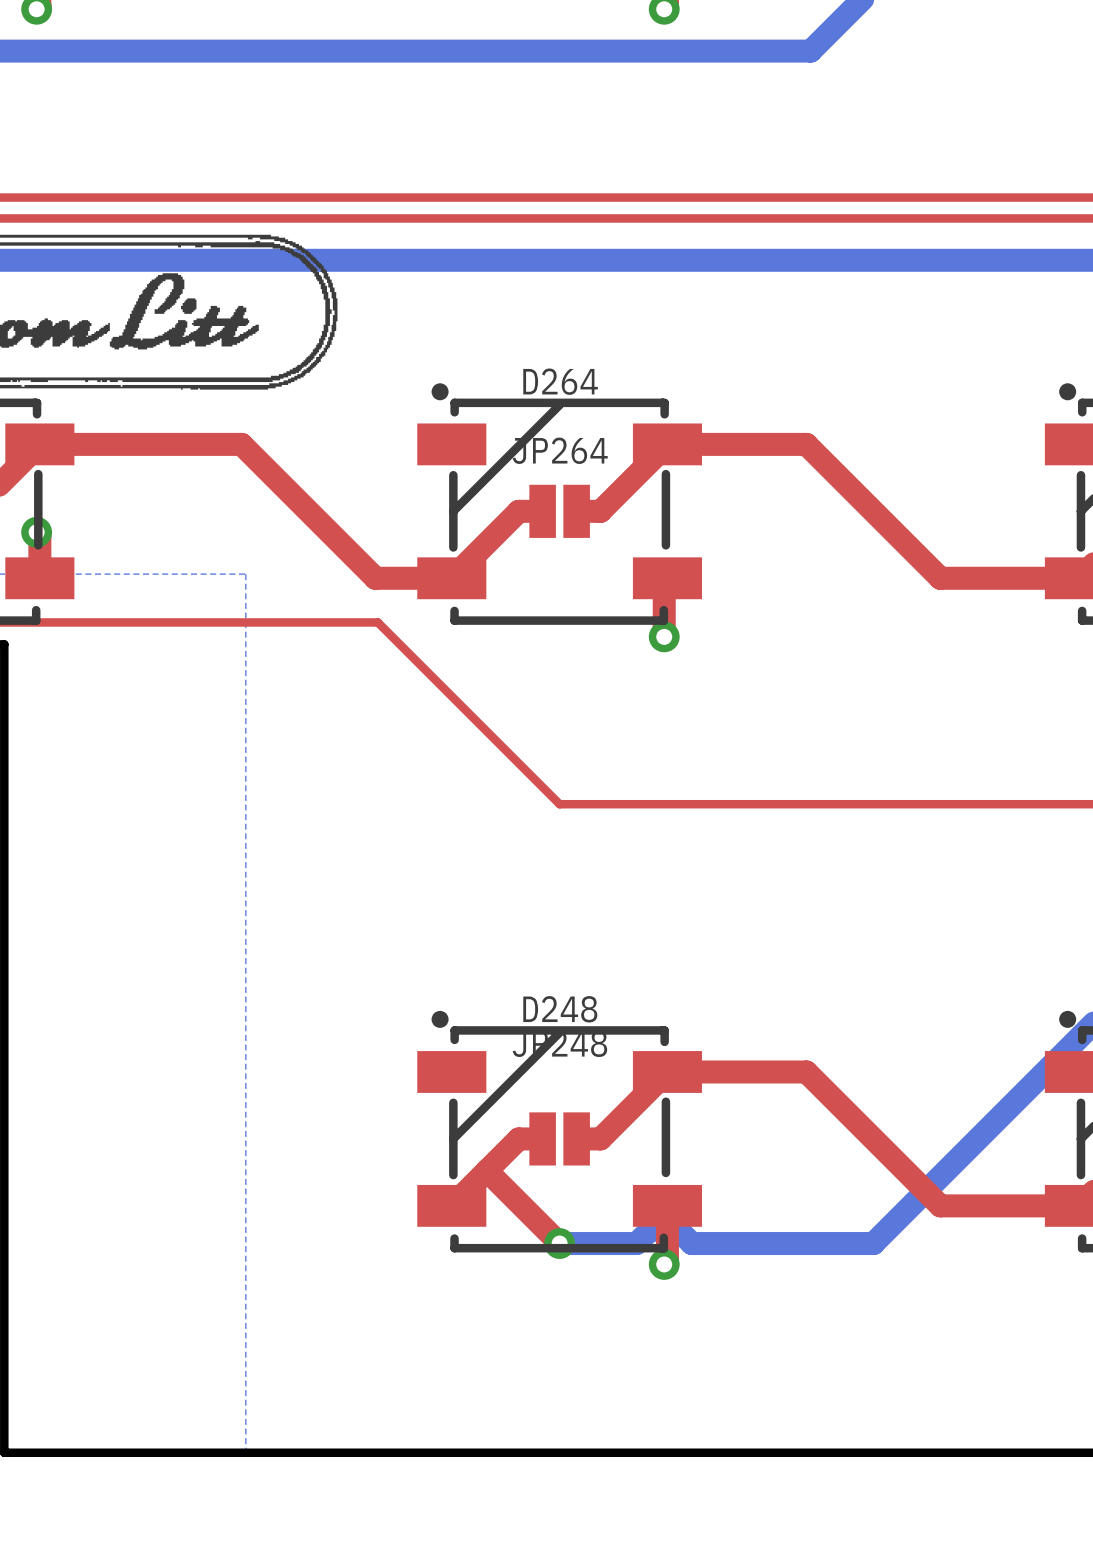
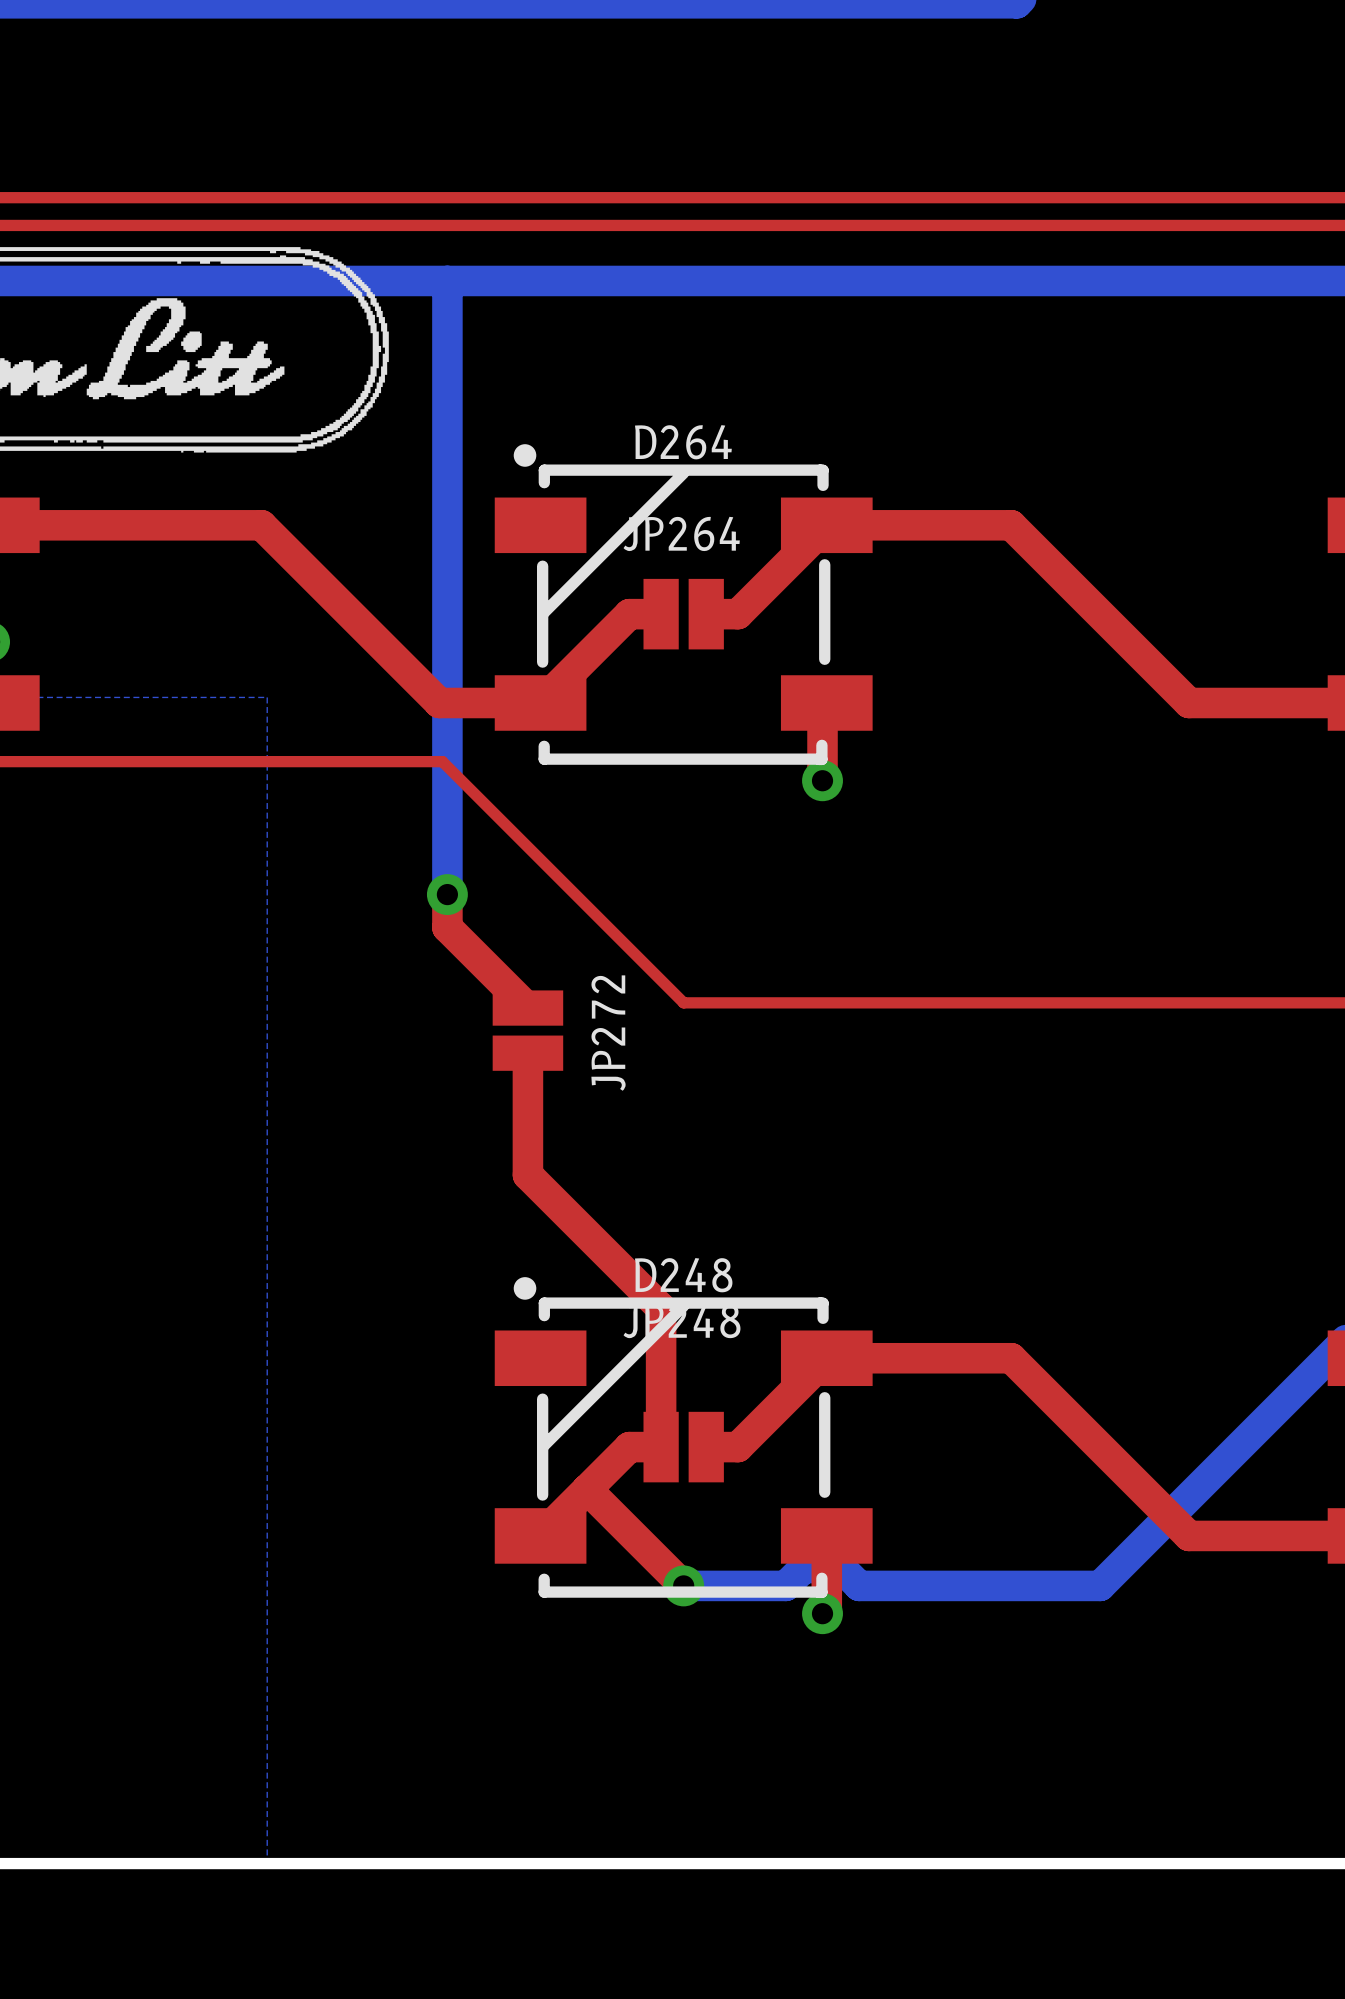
bottom track: none -> (447, 280) (447, 894)
top track: none -> (447, 894) (447, 927) (527, 1008)
via: none -> (447, 894)
JP272: none -> (527, 1030)
top track: none -> (527, 1053) (527, 1175) (661, 1308) (661, 1447)

